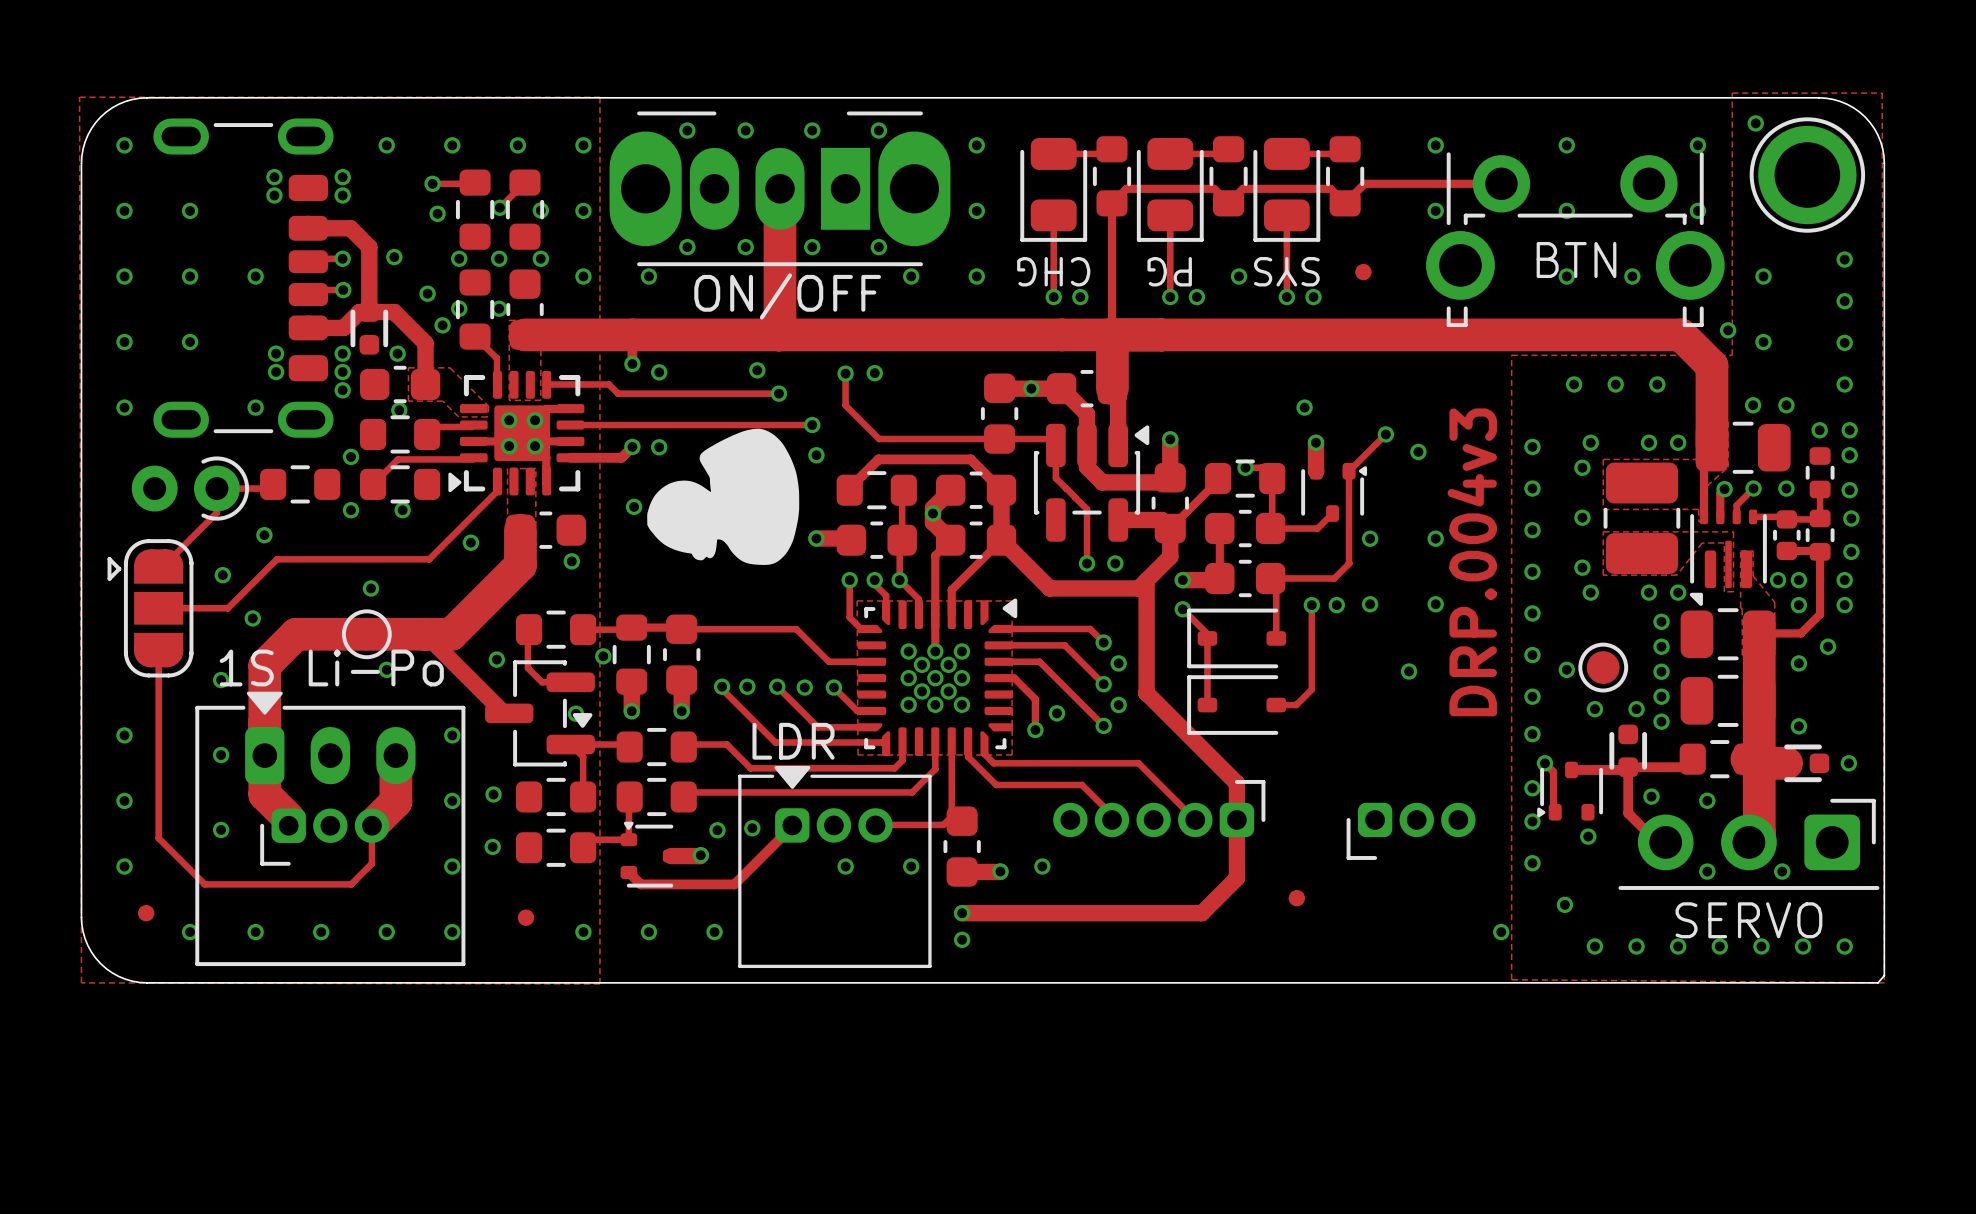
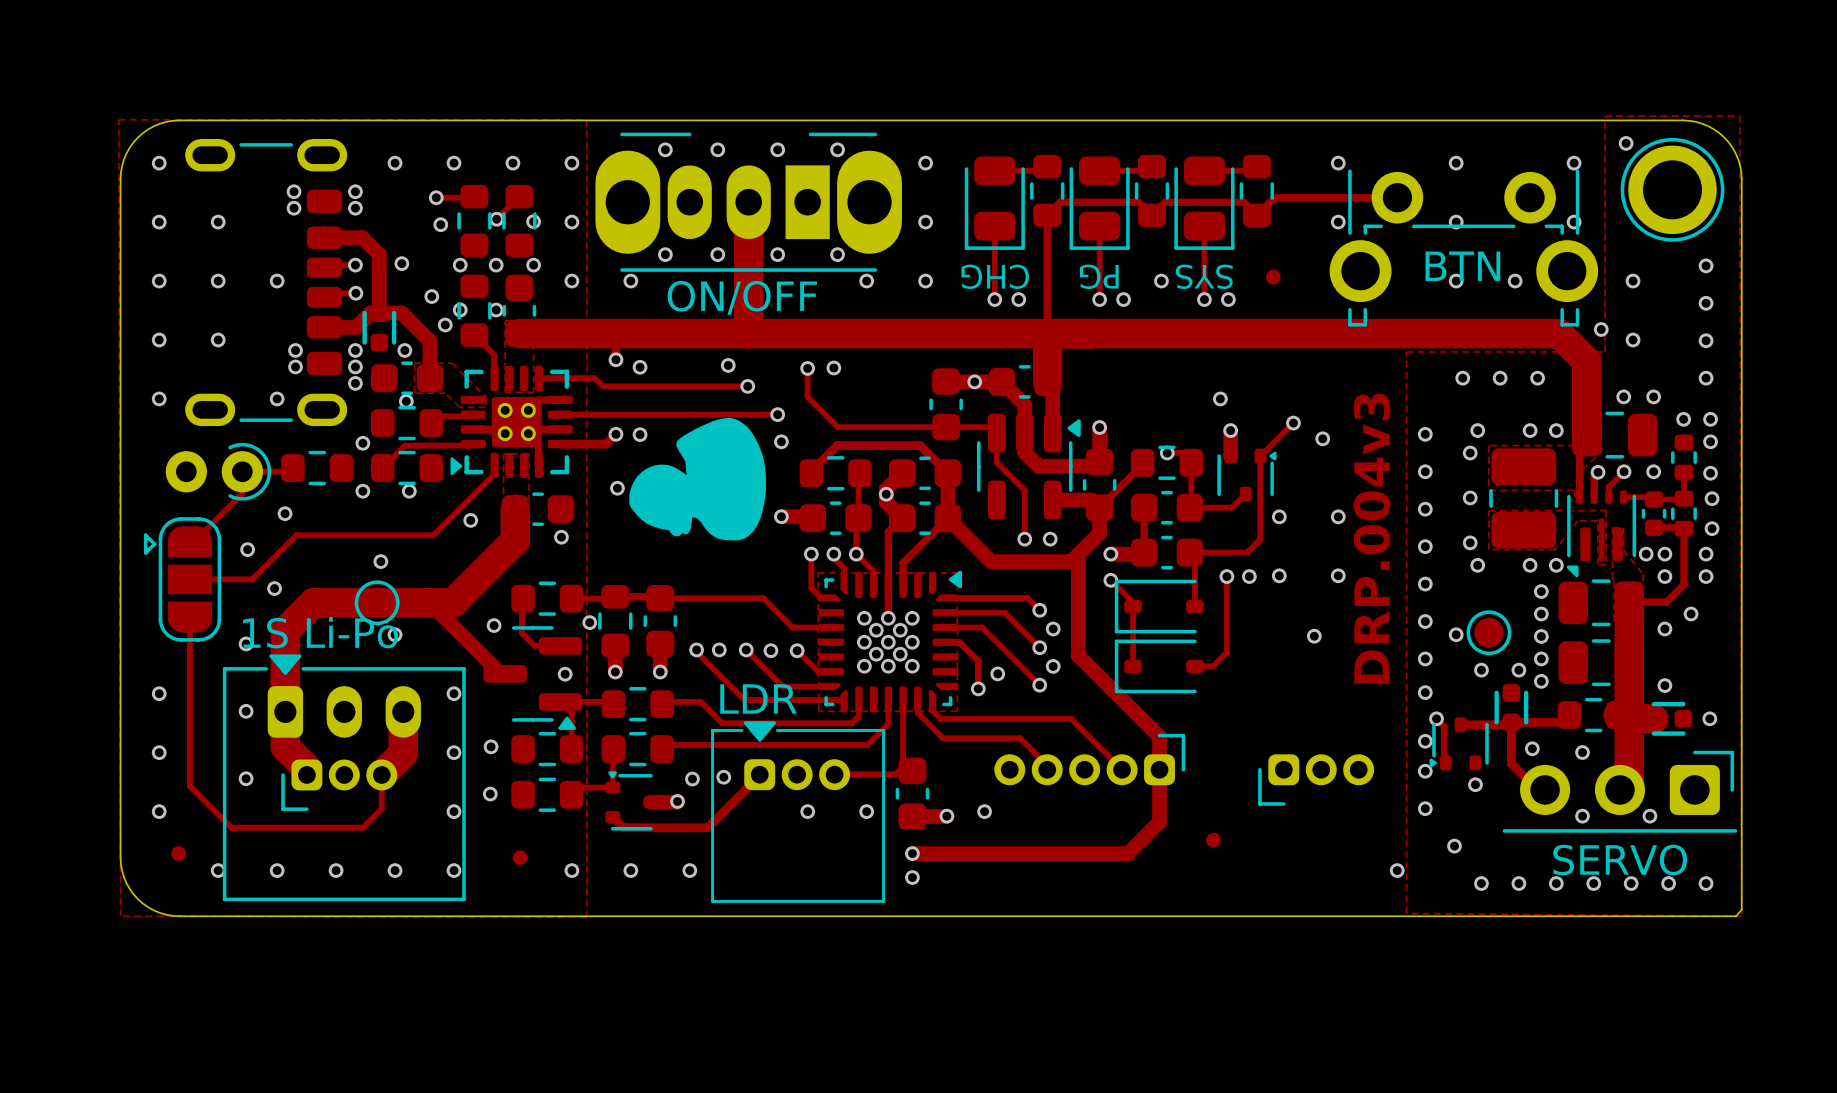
part footprint: [1033, 423, 1150, 542] -> [977, 413, 1081, 520]
part footprint: [485, 660, 595, 767] -> [483, 626, 583, 730]

